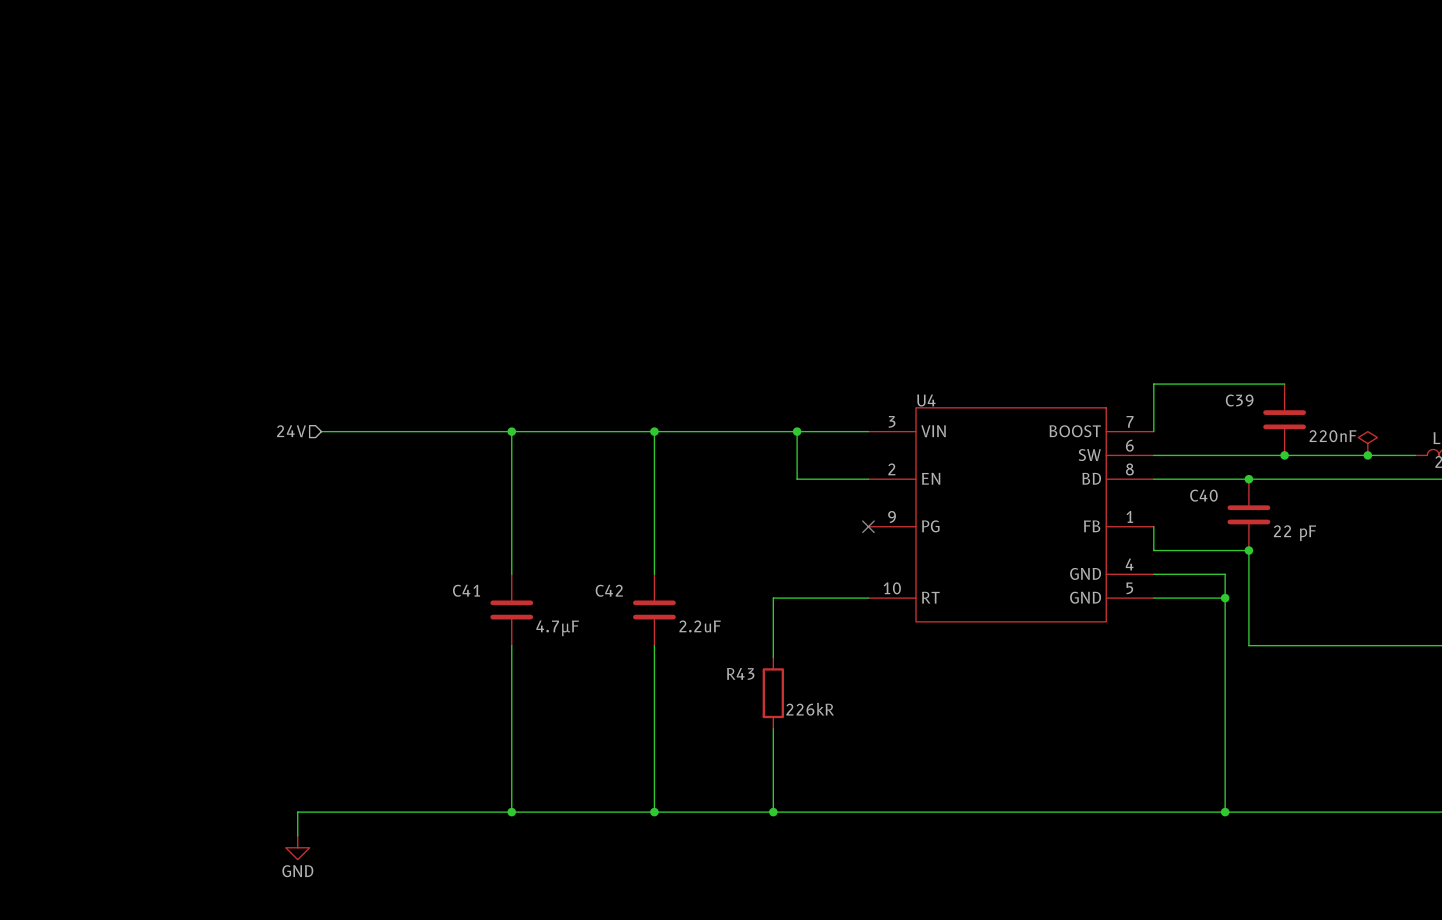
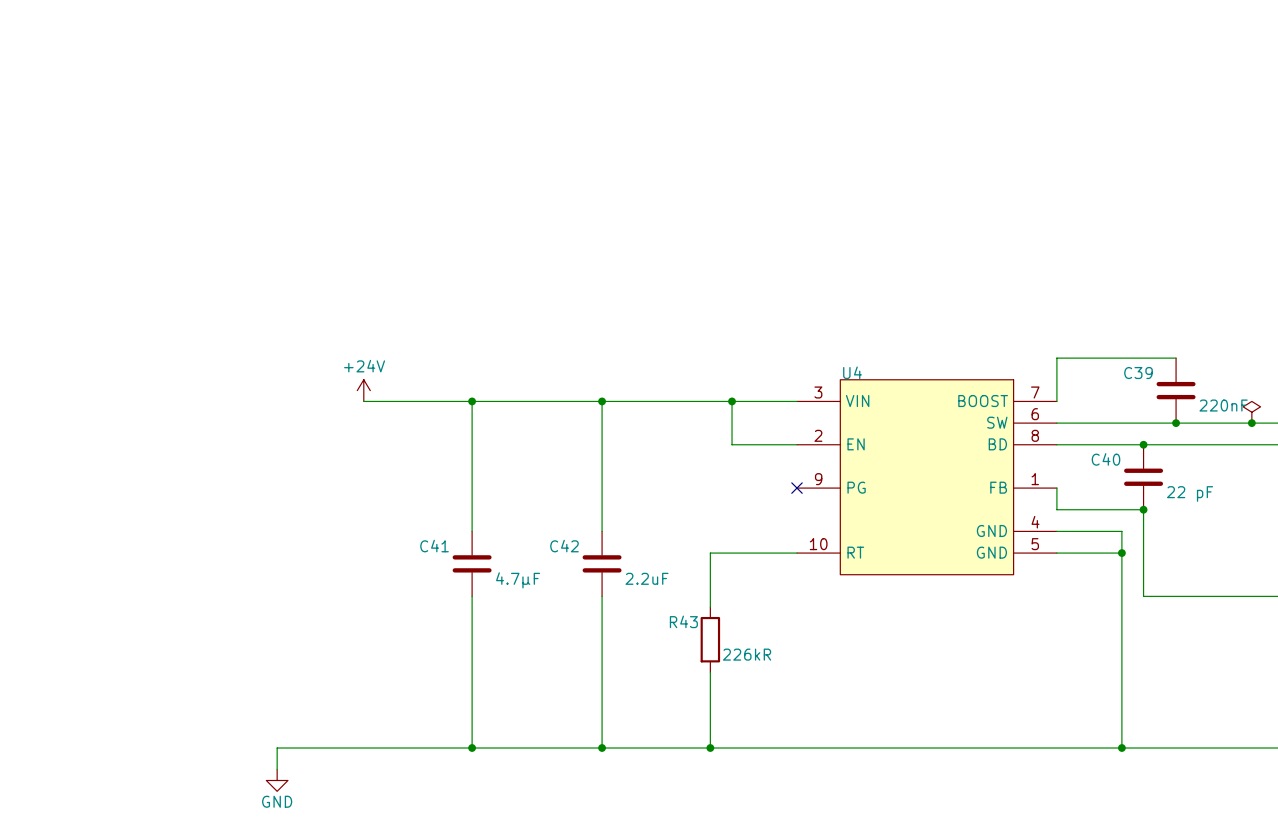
power symbol: none -> +24V (363, 390)
hierarchical label: 24V (291, 431) -> none
wire: (321, 431) (392, 431) -> none

